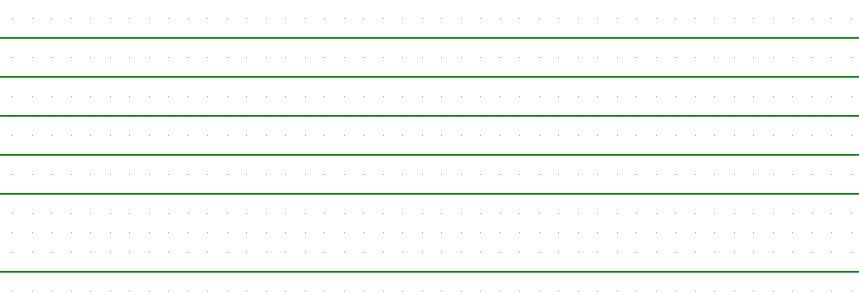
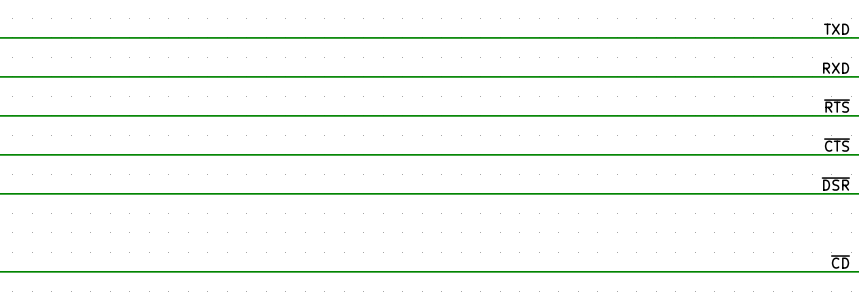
label: none -> TXD (836, 29)
label: none -> RXD (836, 68)
label: none -> ~{RTS} (837, 106)
label: none -> ~{CTS} (837, 145)
label: none -> ~{DSR} (835, 184)
label: none -> ~{CD} (840, 262)

